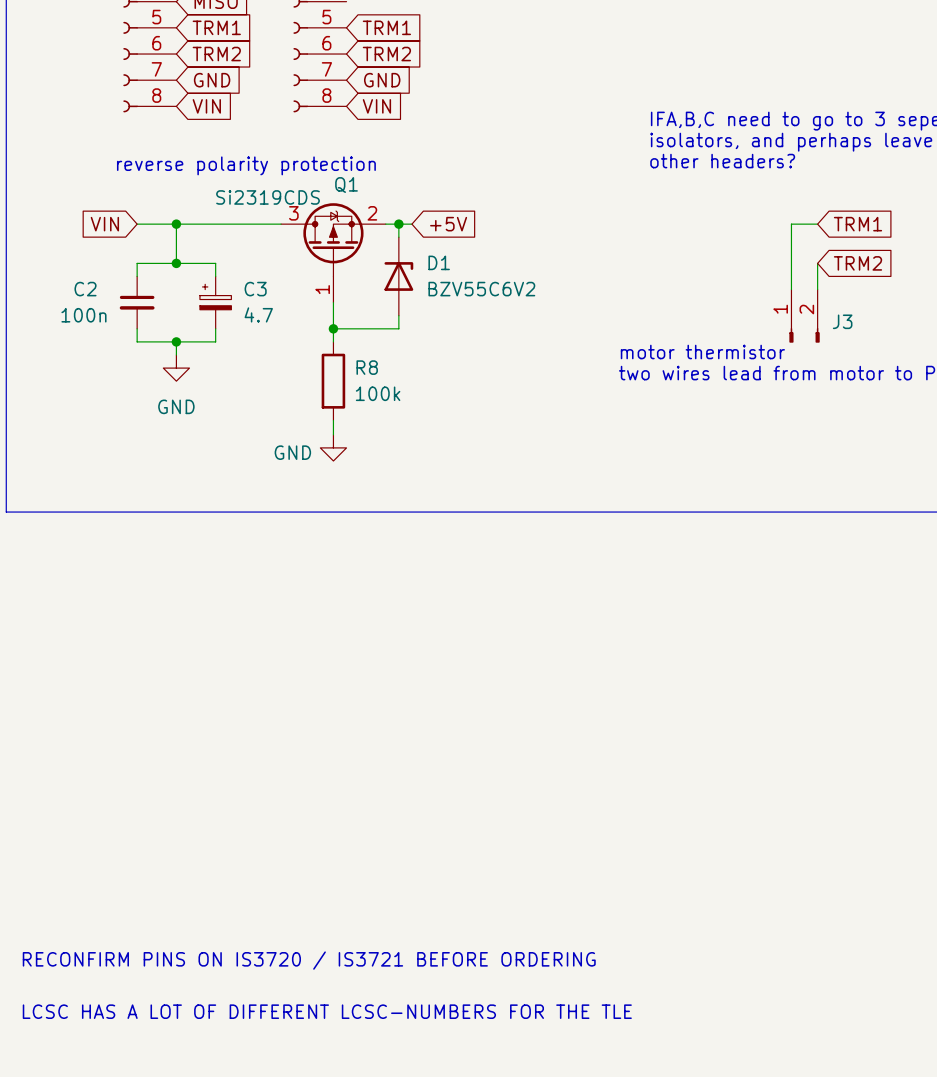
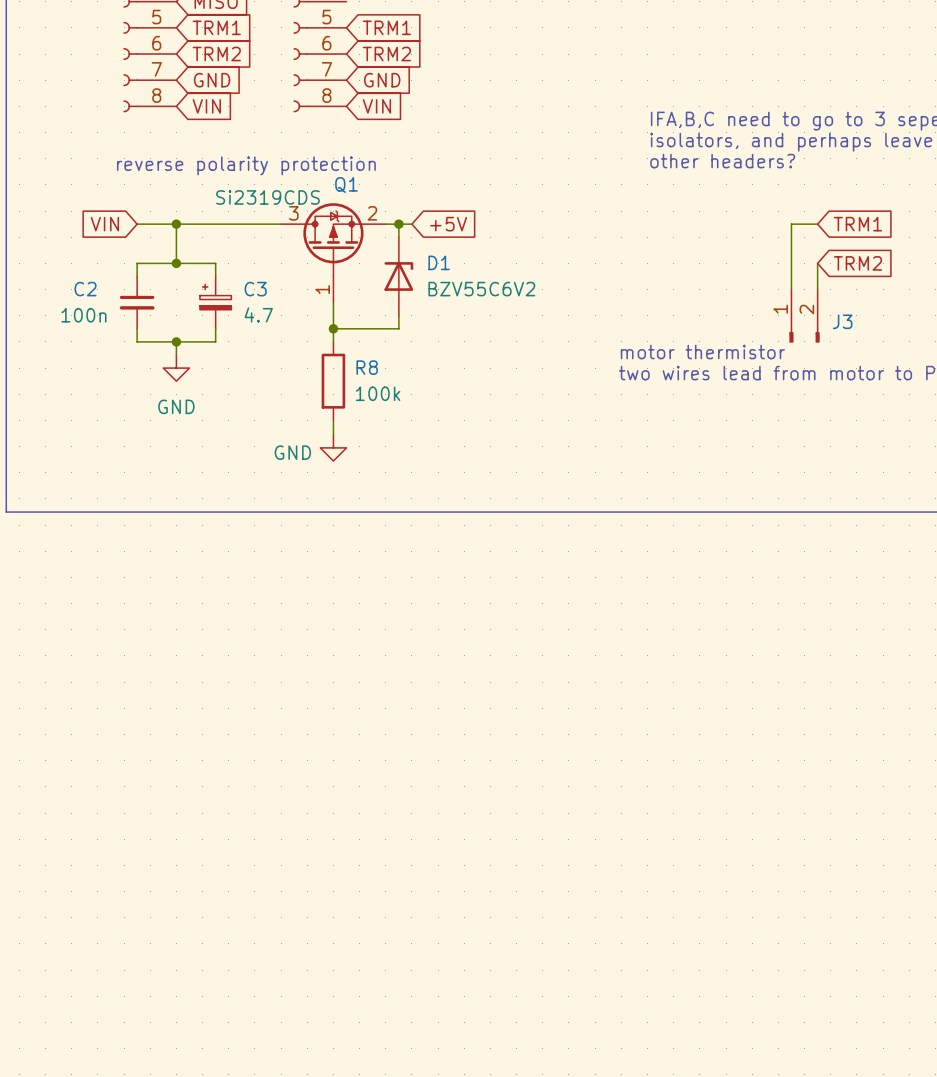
text: RECONFIRM PINS ON IS3720 / IS3721 BEFORE ORDERING (309, 960) -> none
text: LCSC HAS A LOT OF DIFFERENT LCSC-NUMBERS FOR THE TLE (327, 1011) -> none

